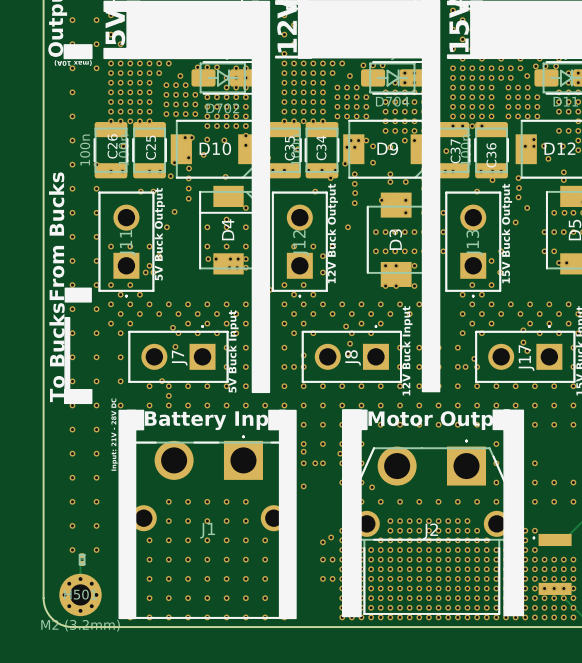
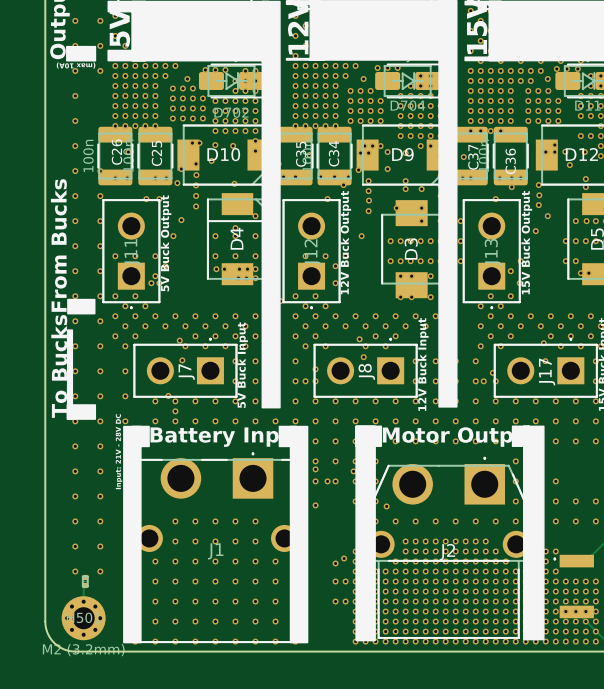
via: (523, 342) -> none
via: none -> (545, 361)
via: (527, 351) -> none
via: (348, 353) -> none

